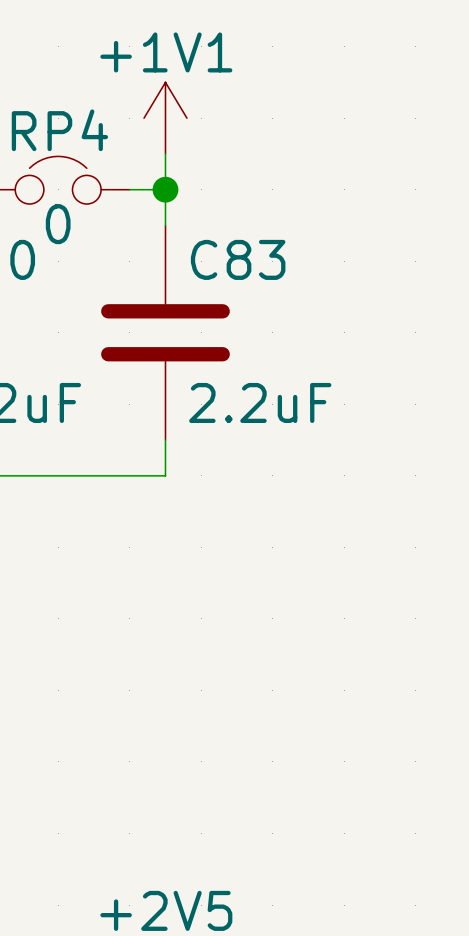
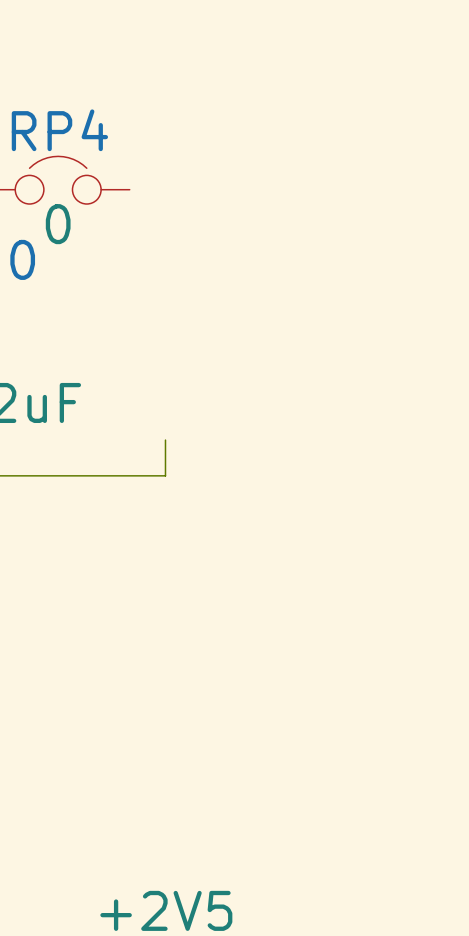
power symbol: +1V1 (165, 118) -> none
wire: (165, 153) (165, 225) -> none
wire: (129, 189) (165, 189) -> none
junction: (165, 189) -> none
C83: 2.2uF (165, 332) -> none

